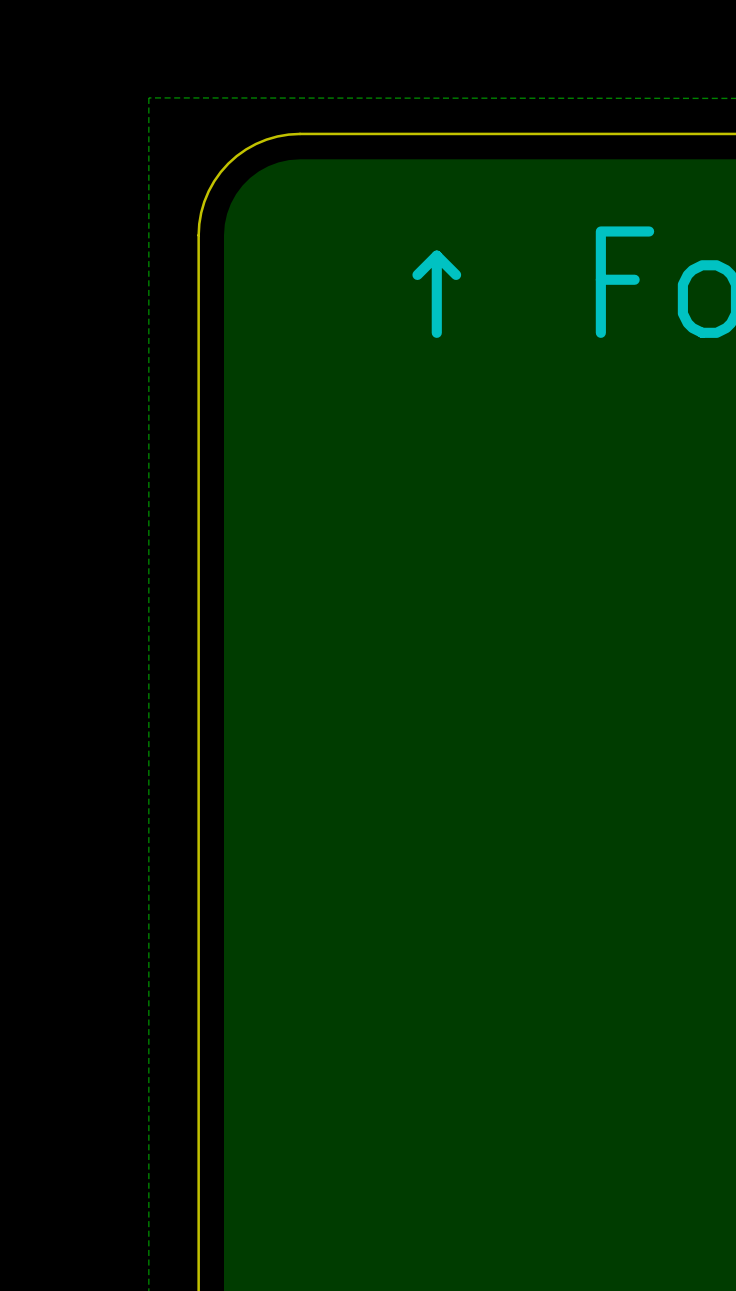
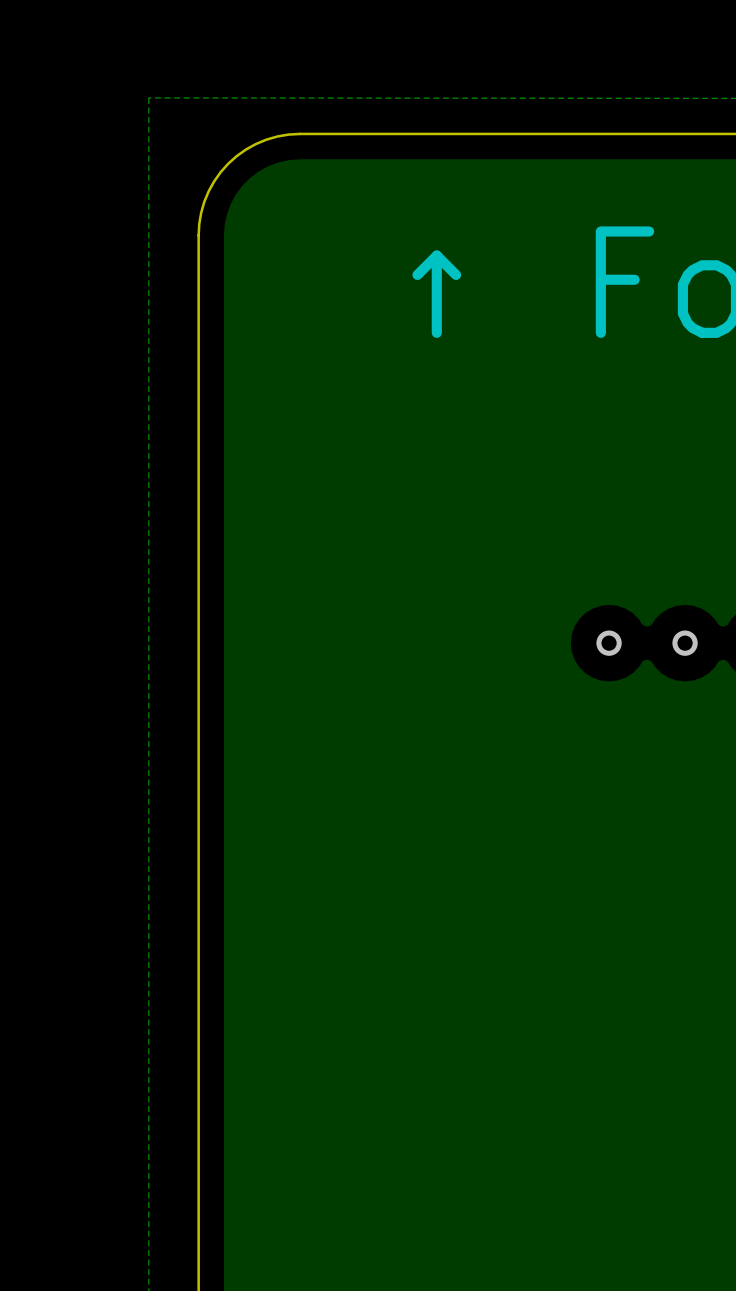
via: none -> (609, 643)
via: none -> (685, 643)

